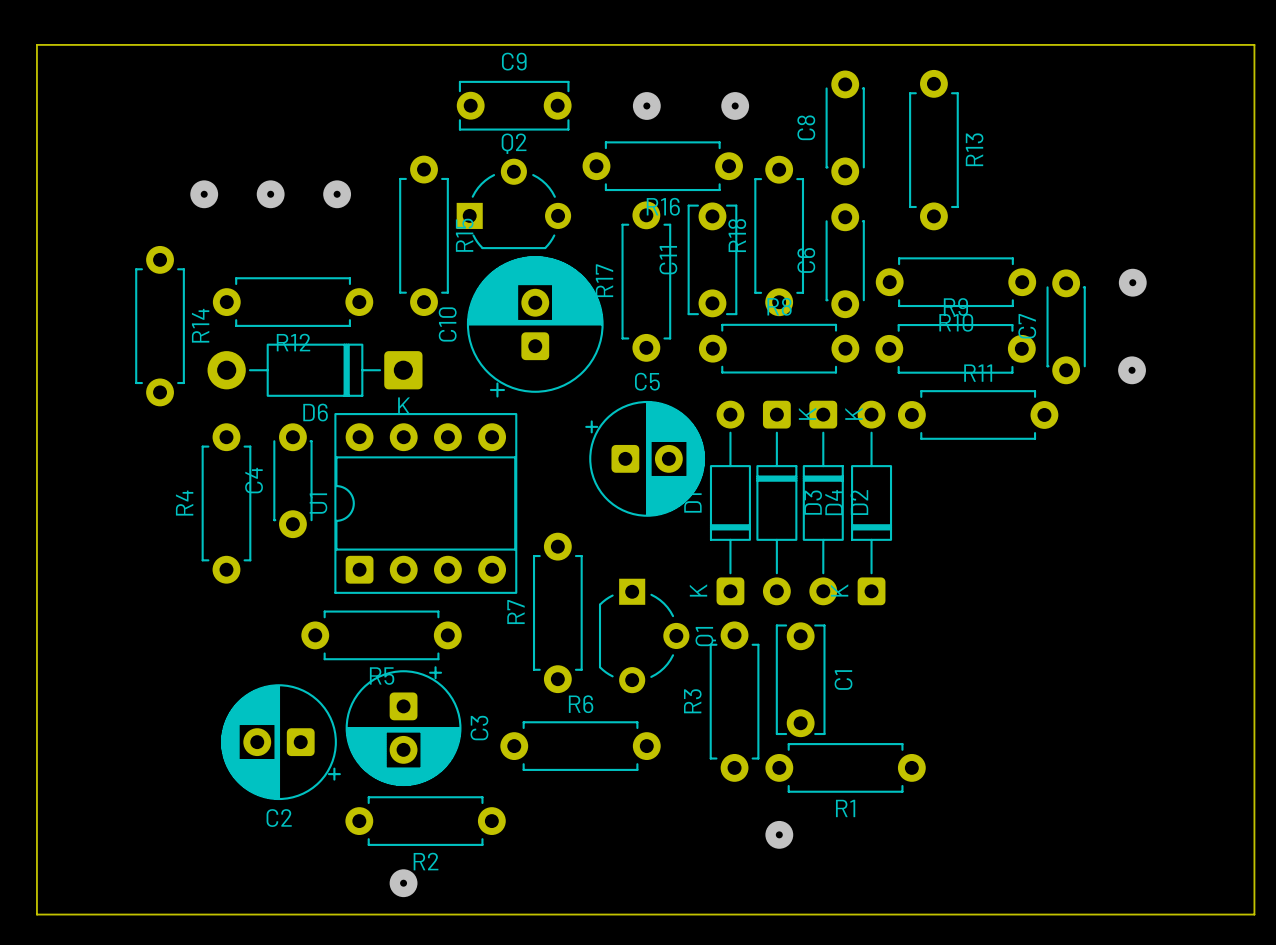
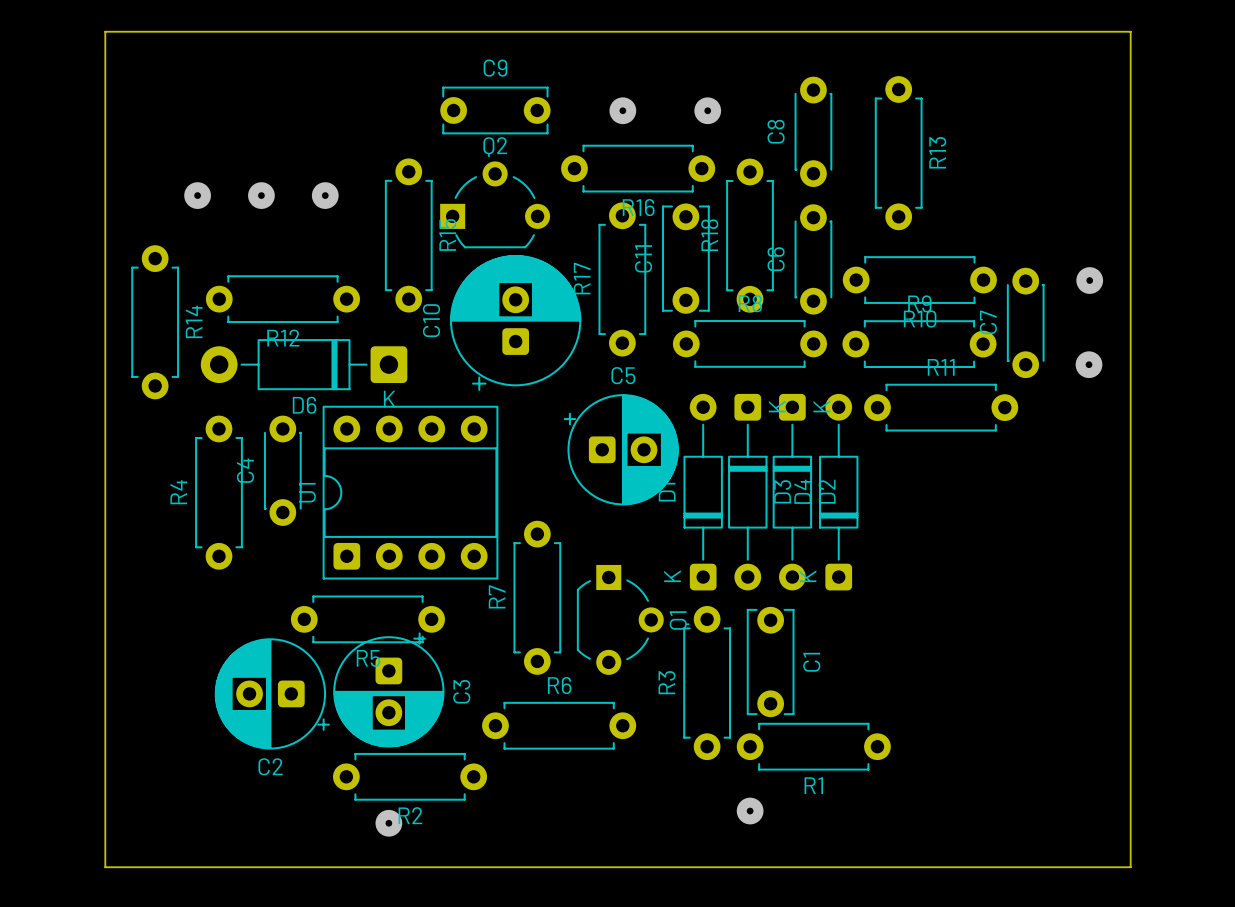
board edge: (36, 44) (1254, 44) (1254, 914) (36, 914) (36, 44) -> (105, 31) (105, 867) (1130, 867) (1130, 31) (105, 31)
C3 position: (403, 726) -> (388, 689)
C2 position: (280, 742) -> (272, 693)
R2 position: (425, 821) -> (410, 776)
via position: (403, 883) -> (388, 823)

